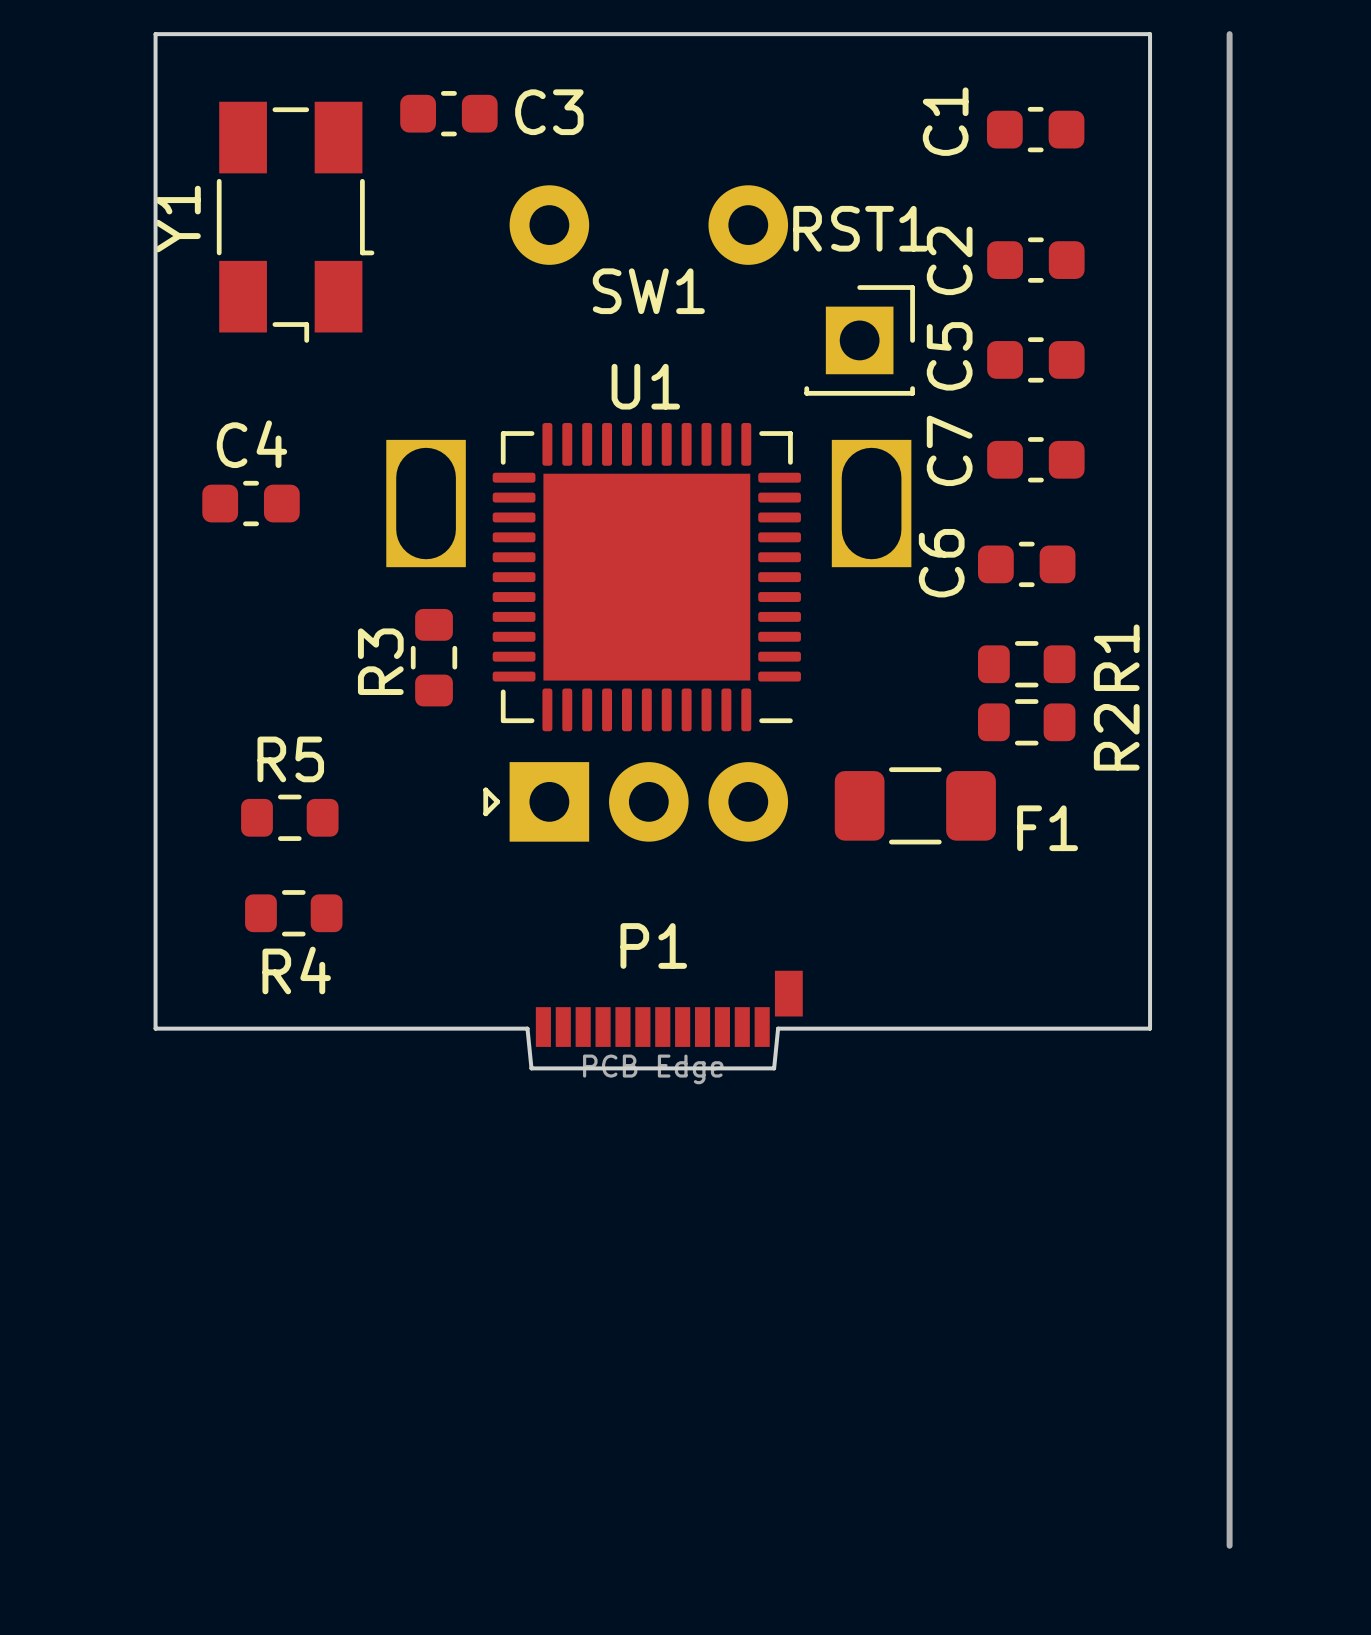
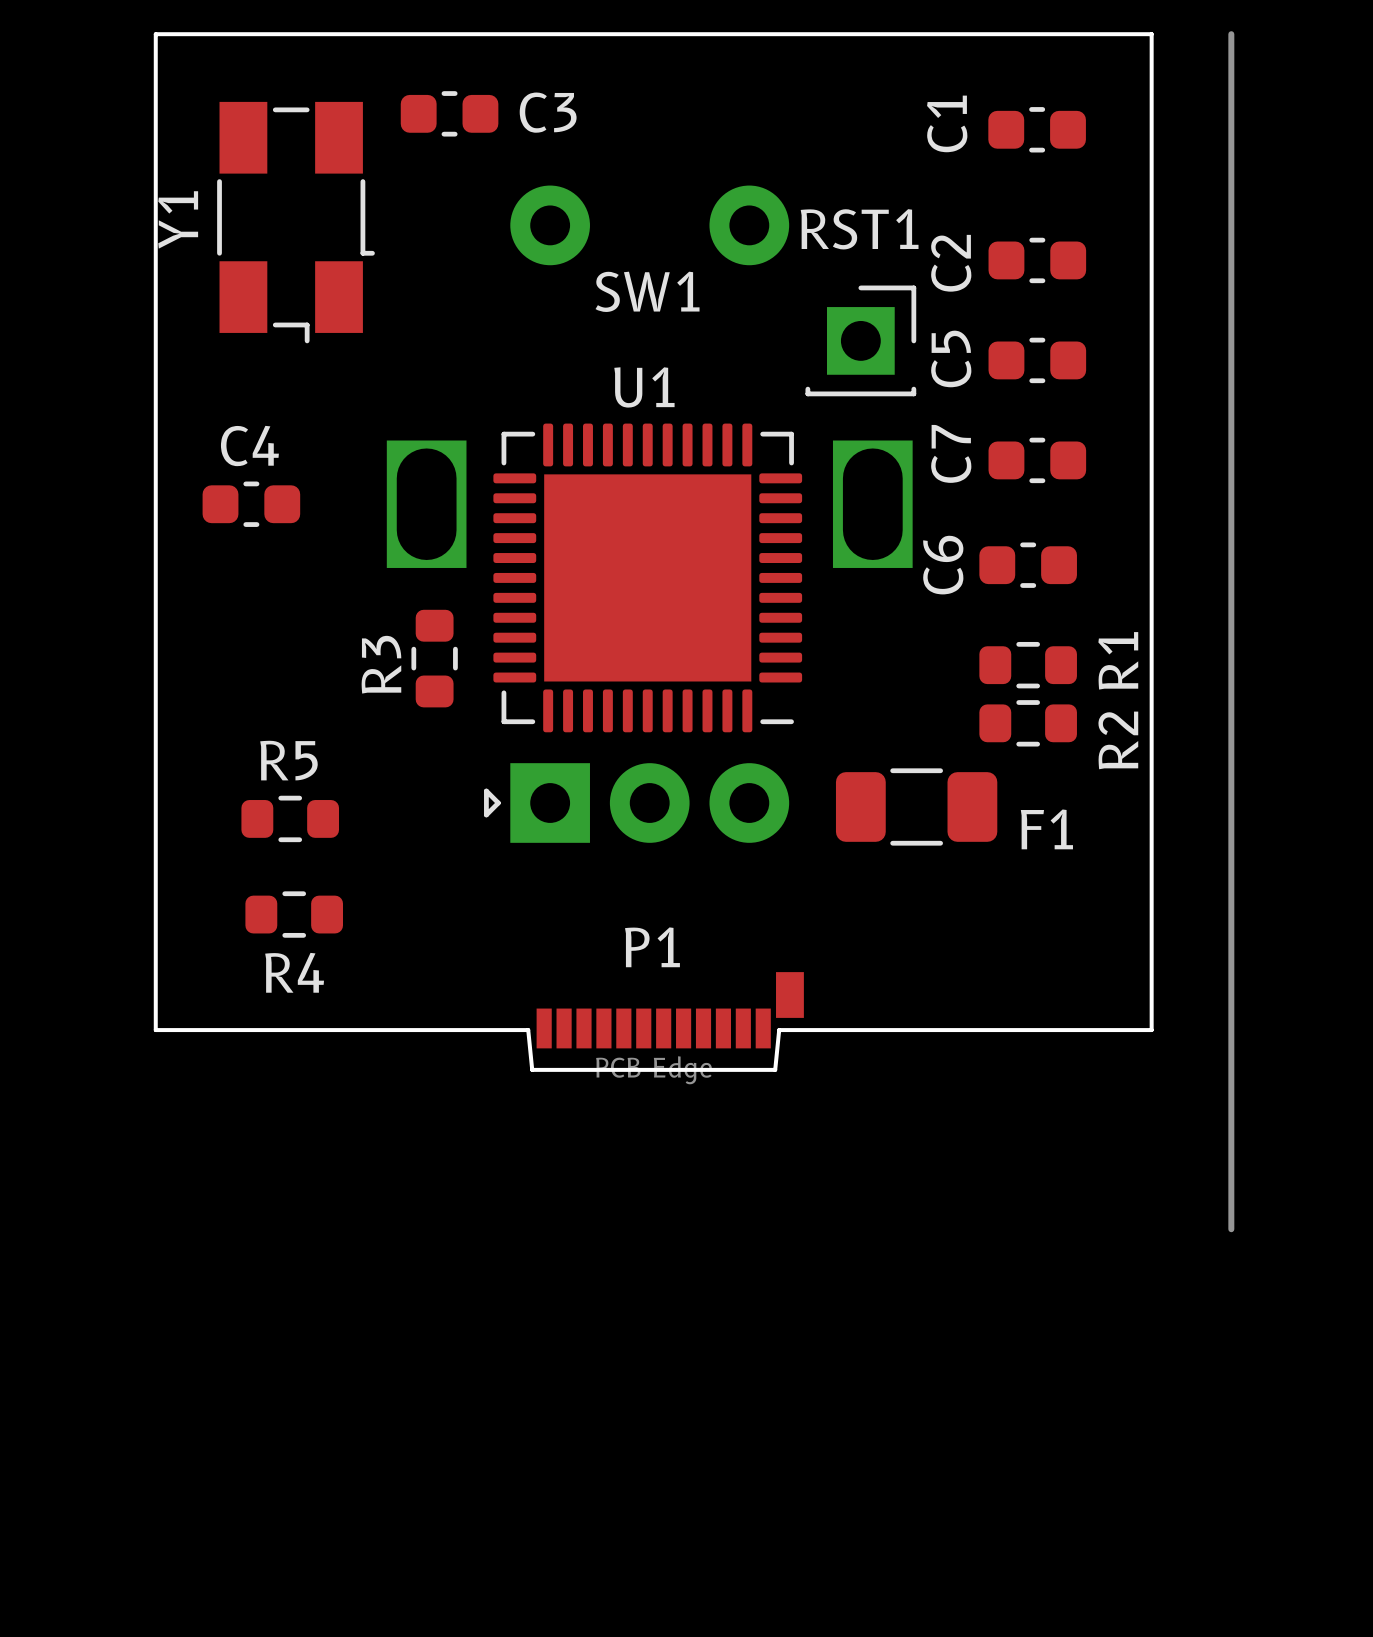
line: (1229, 1227) (1229, 1545) -> none

